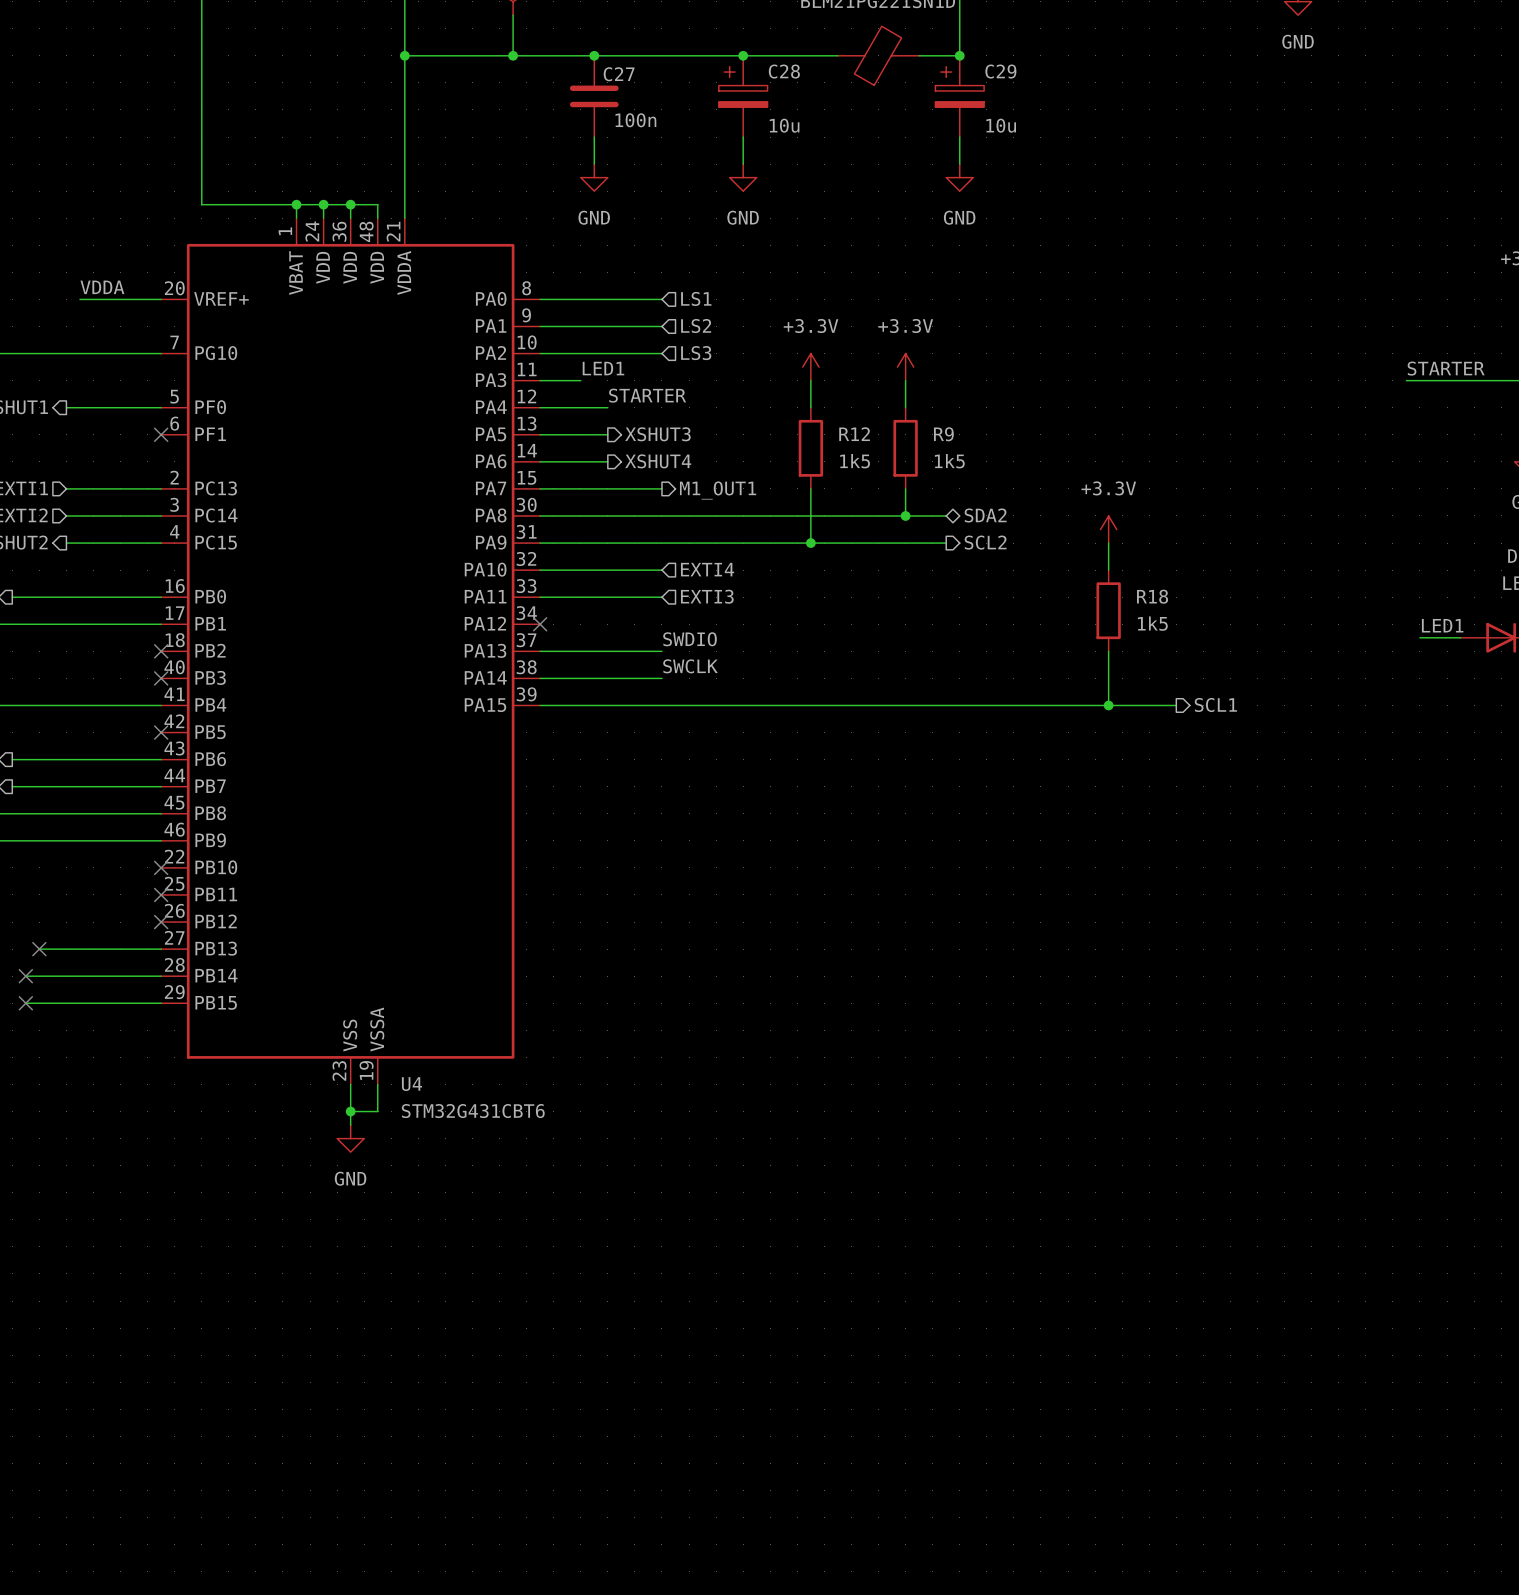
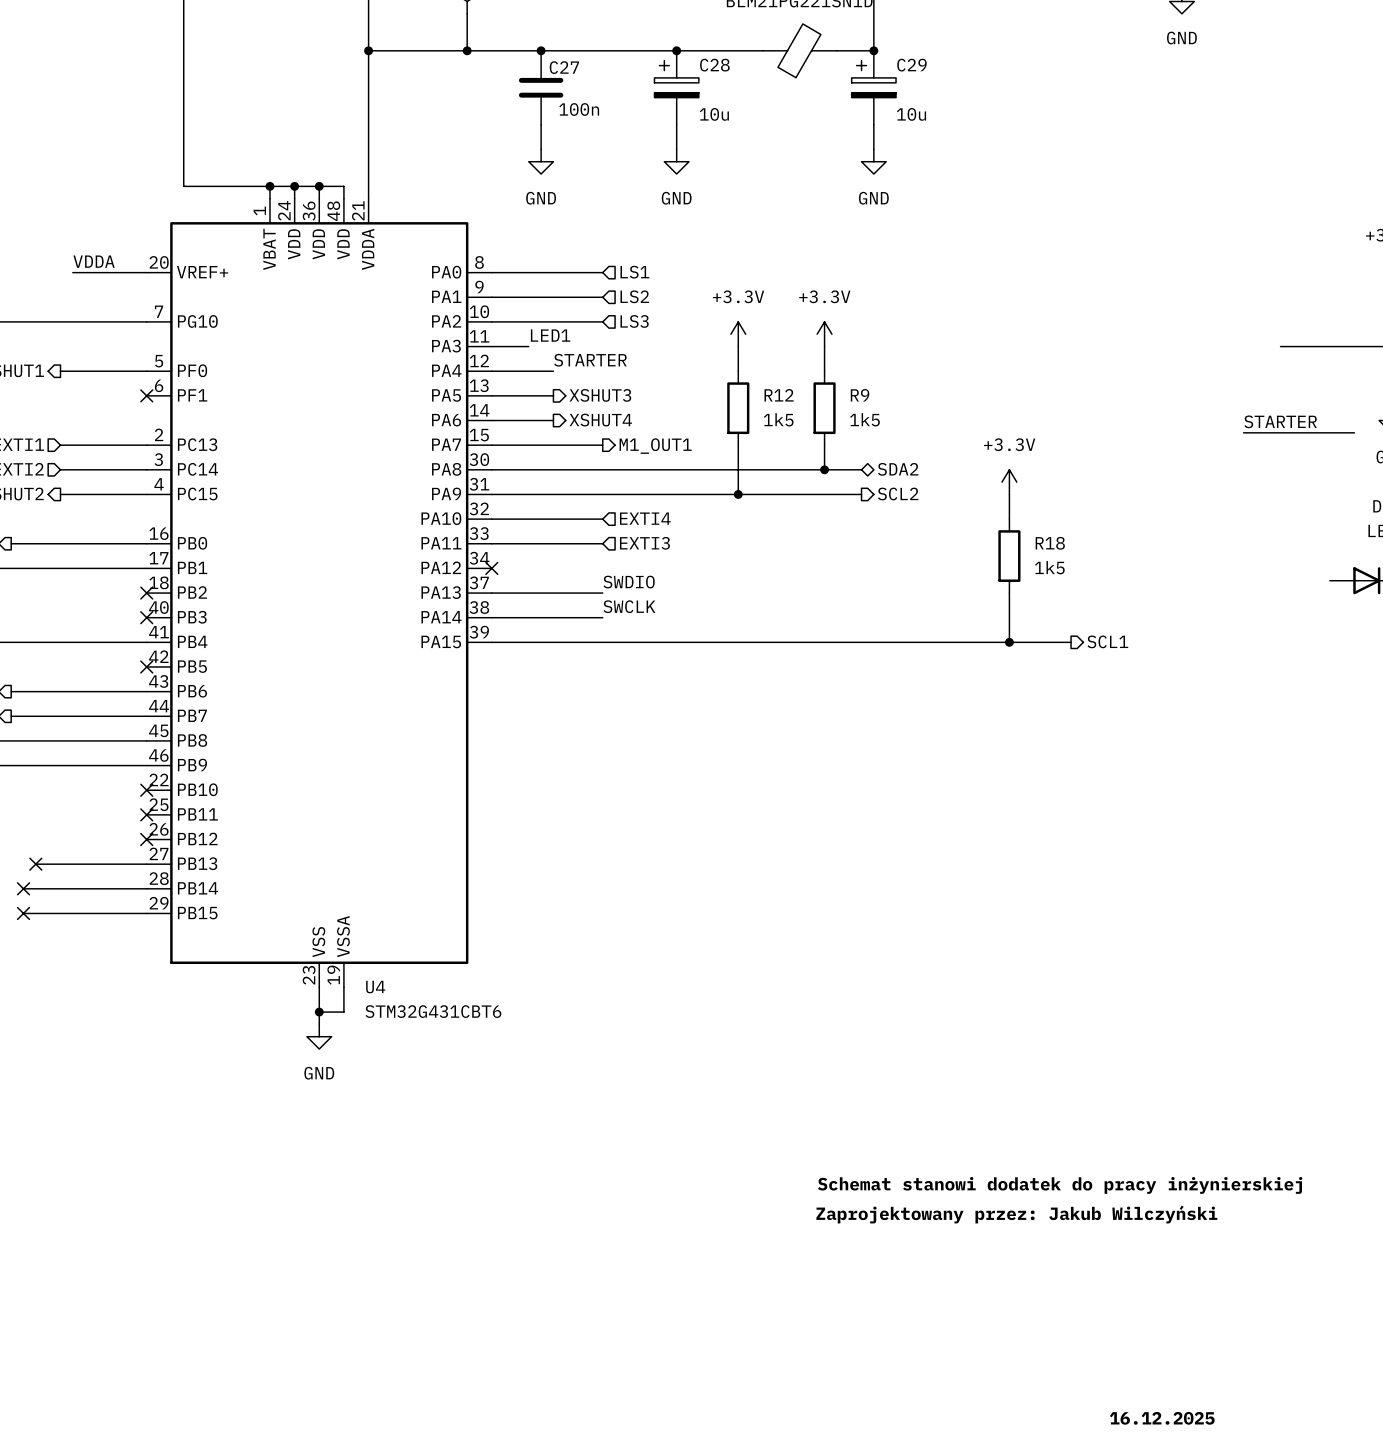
label position: STARTER (1446, 368) -> STARTER (1280, 421)
wire: none -> (1243, 432) (1354, 432)
label: LED1 (1442, 625) -> none
wire: (1419, 637) (1460, 637) -> none
text: none -> Schemat stanowi dodatek do pracy inżynierskiej (1060, 1185)
text: none -> Zaprojektowany przez: Jakub Wilczyński (1016, 1214)
text: none -> 16.12.2025 (1162, 1418)

